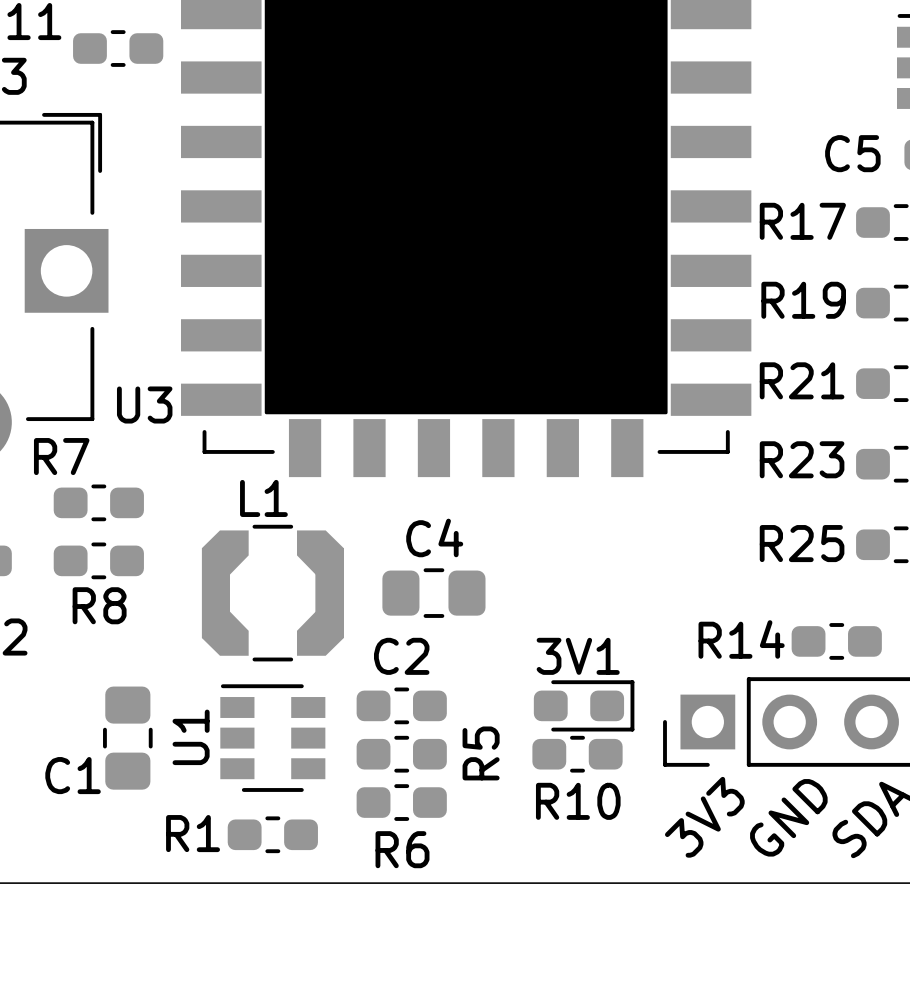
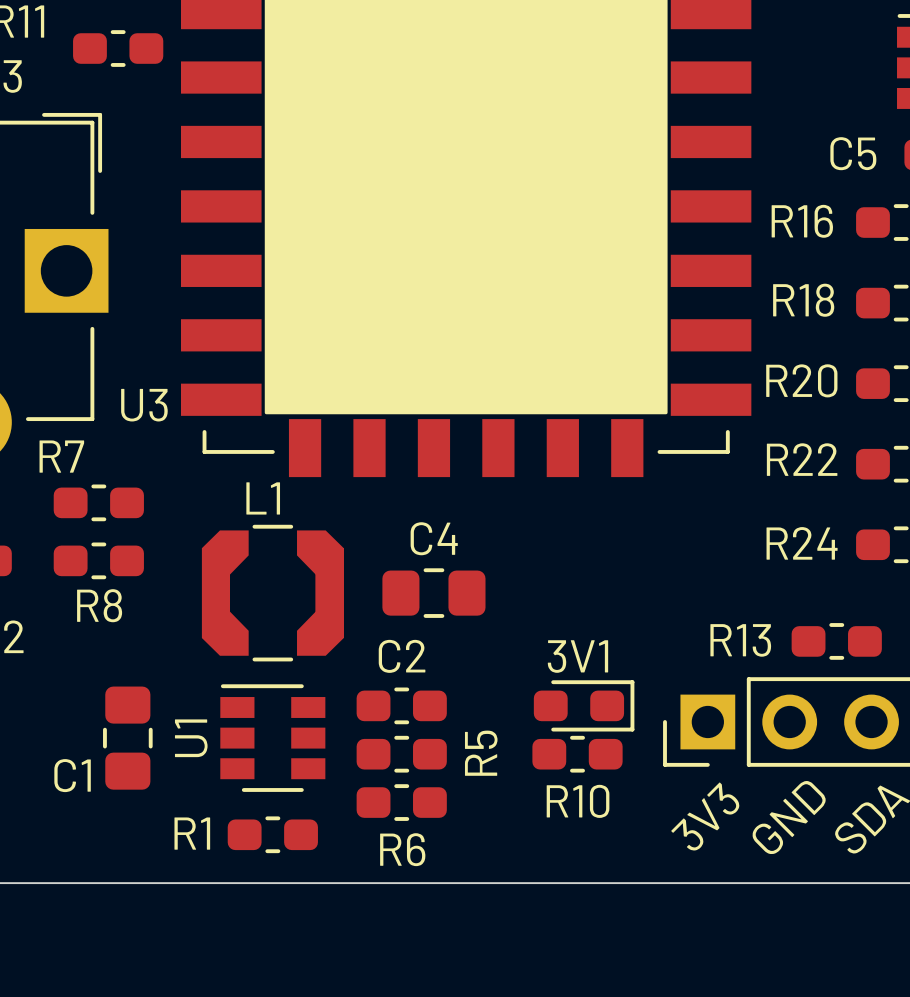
R17 name: R17 (802, 221) -> R16 (802, 221)
R19 name: R19 (803, 300) -> R18 (803, 300)
R21 name: R21 (802, 380) -> R20 (801, 380)
R23 name: R23 (802, 459) -> R22 (802, 459)
R25 name: R25 (802, 543) -> R24 (802, 543)
R14 name: R14 (741, 639) -> R13 (740, 640)

